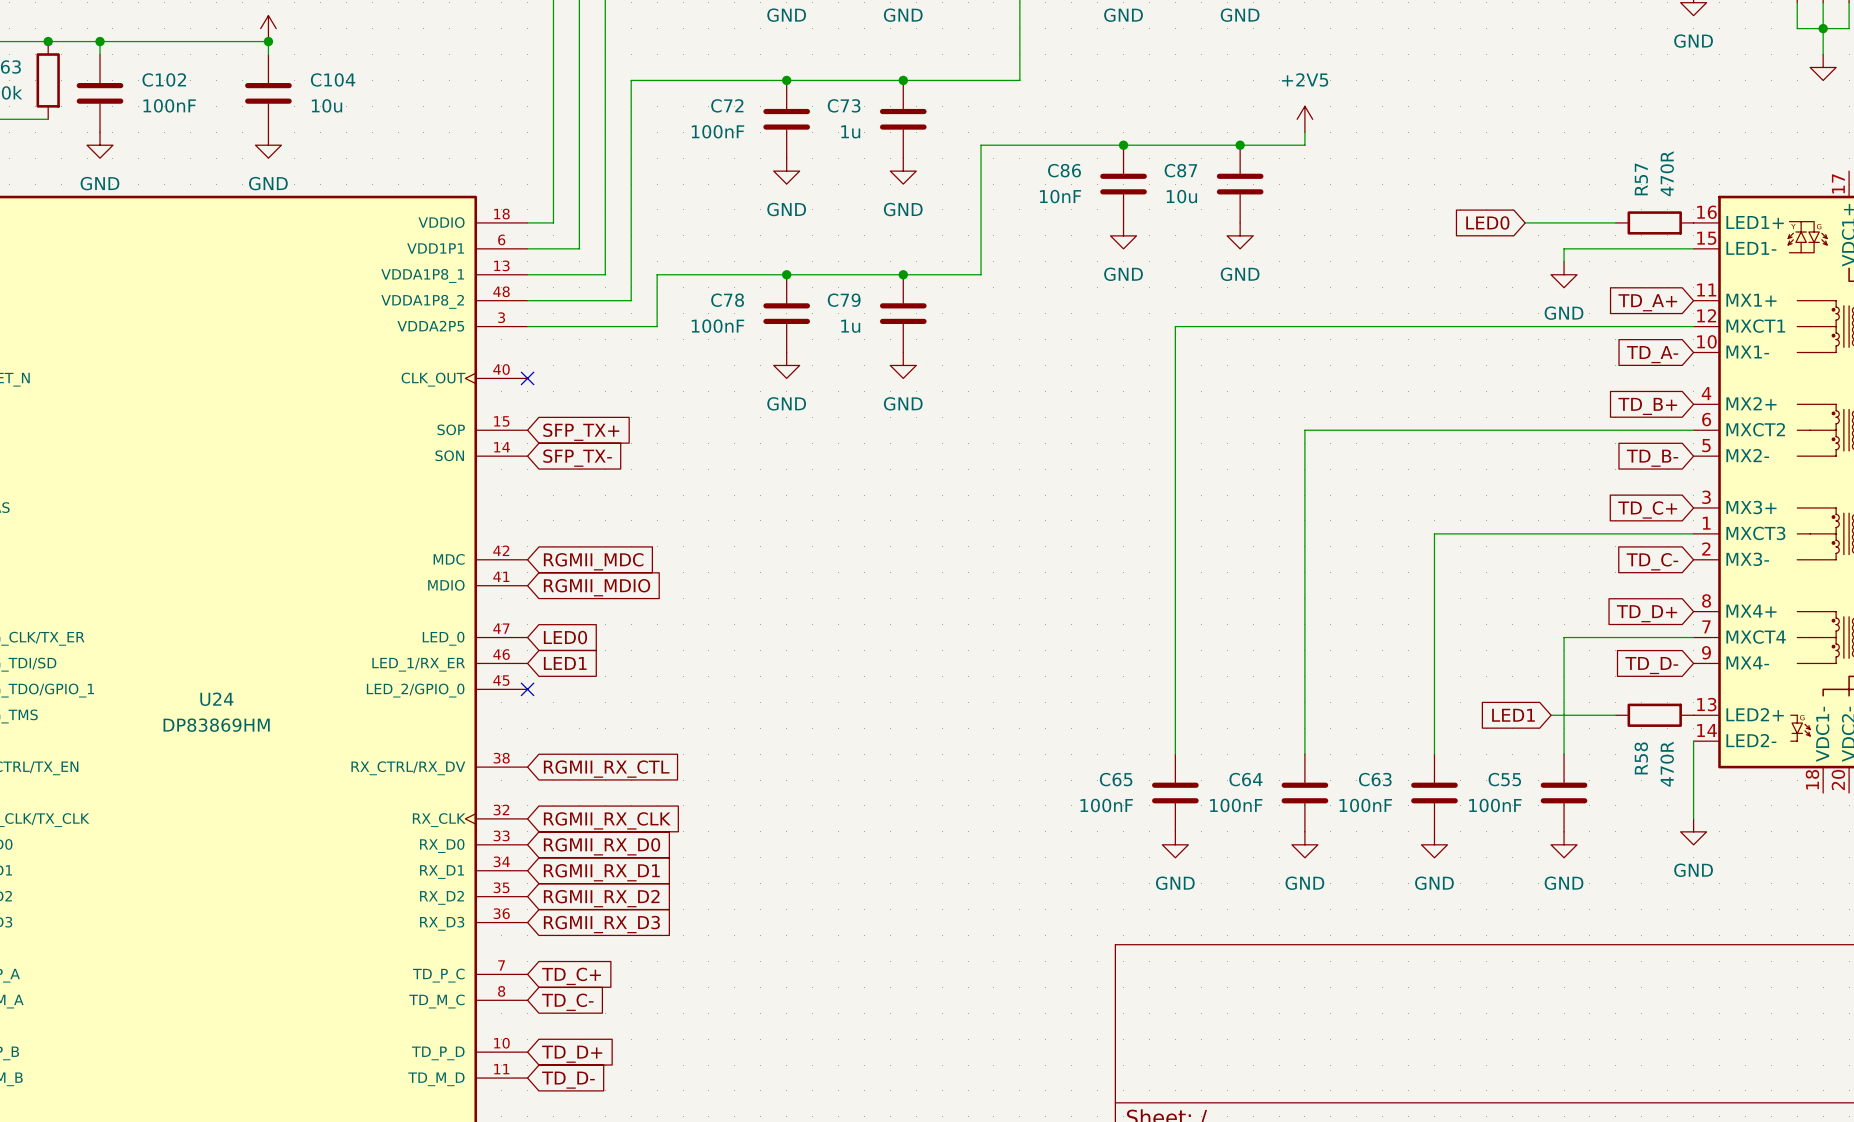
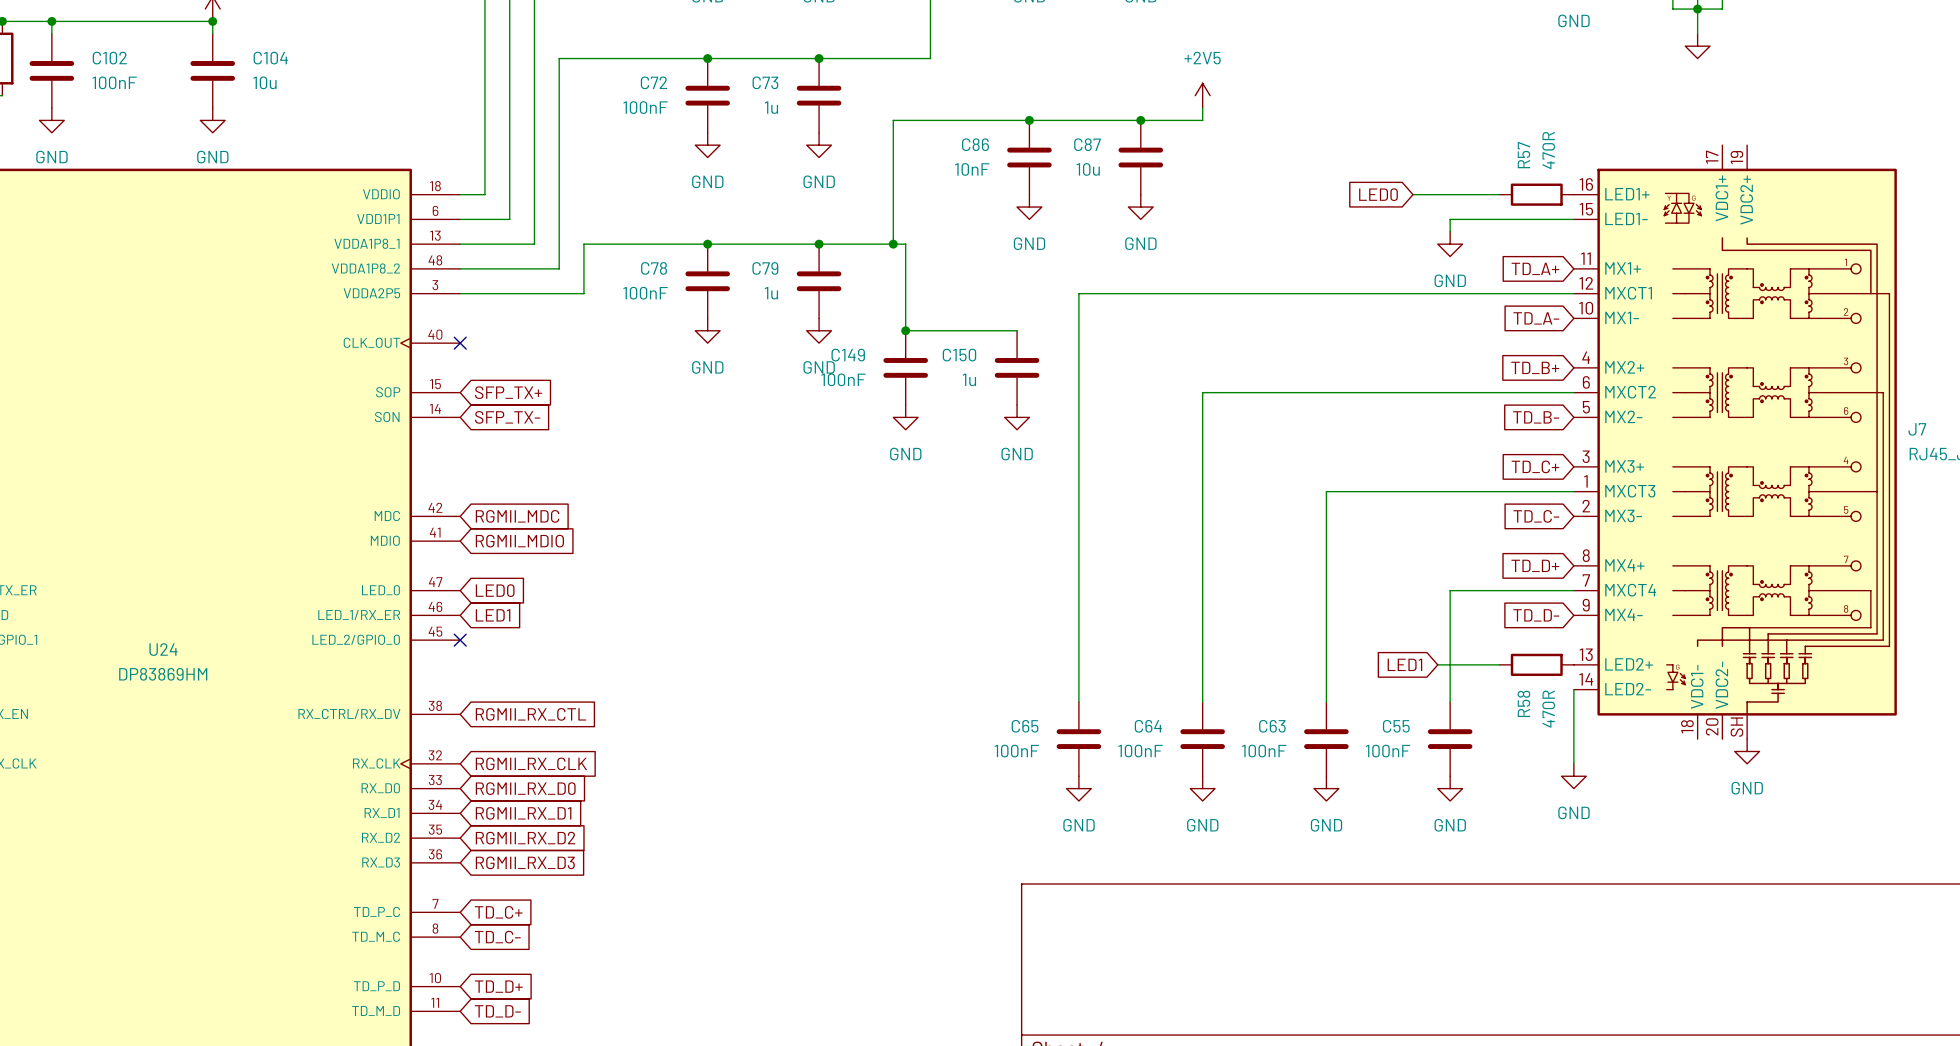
wire: none -> (893, 244) (905, 244) (905, 330) (1017, 330)
junction: none -> (893, 244)
junction: none -> (905, 330)
C149: none -> 100nF (905, 367)
C150: none -> 1u (1017, 367)
power symbol: none -> GND (905, 417)
power symbol: none -> GND (1017, 417)

